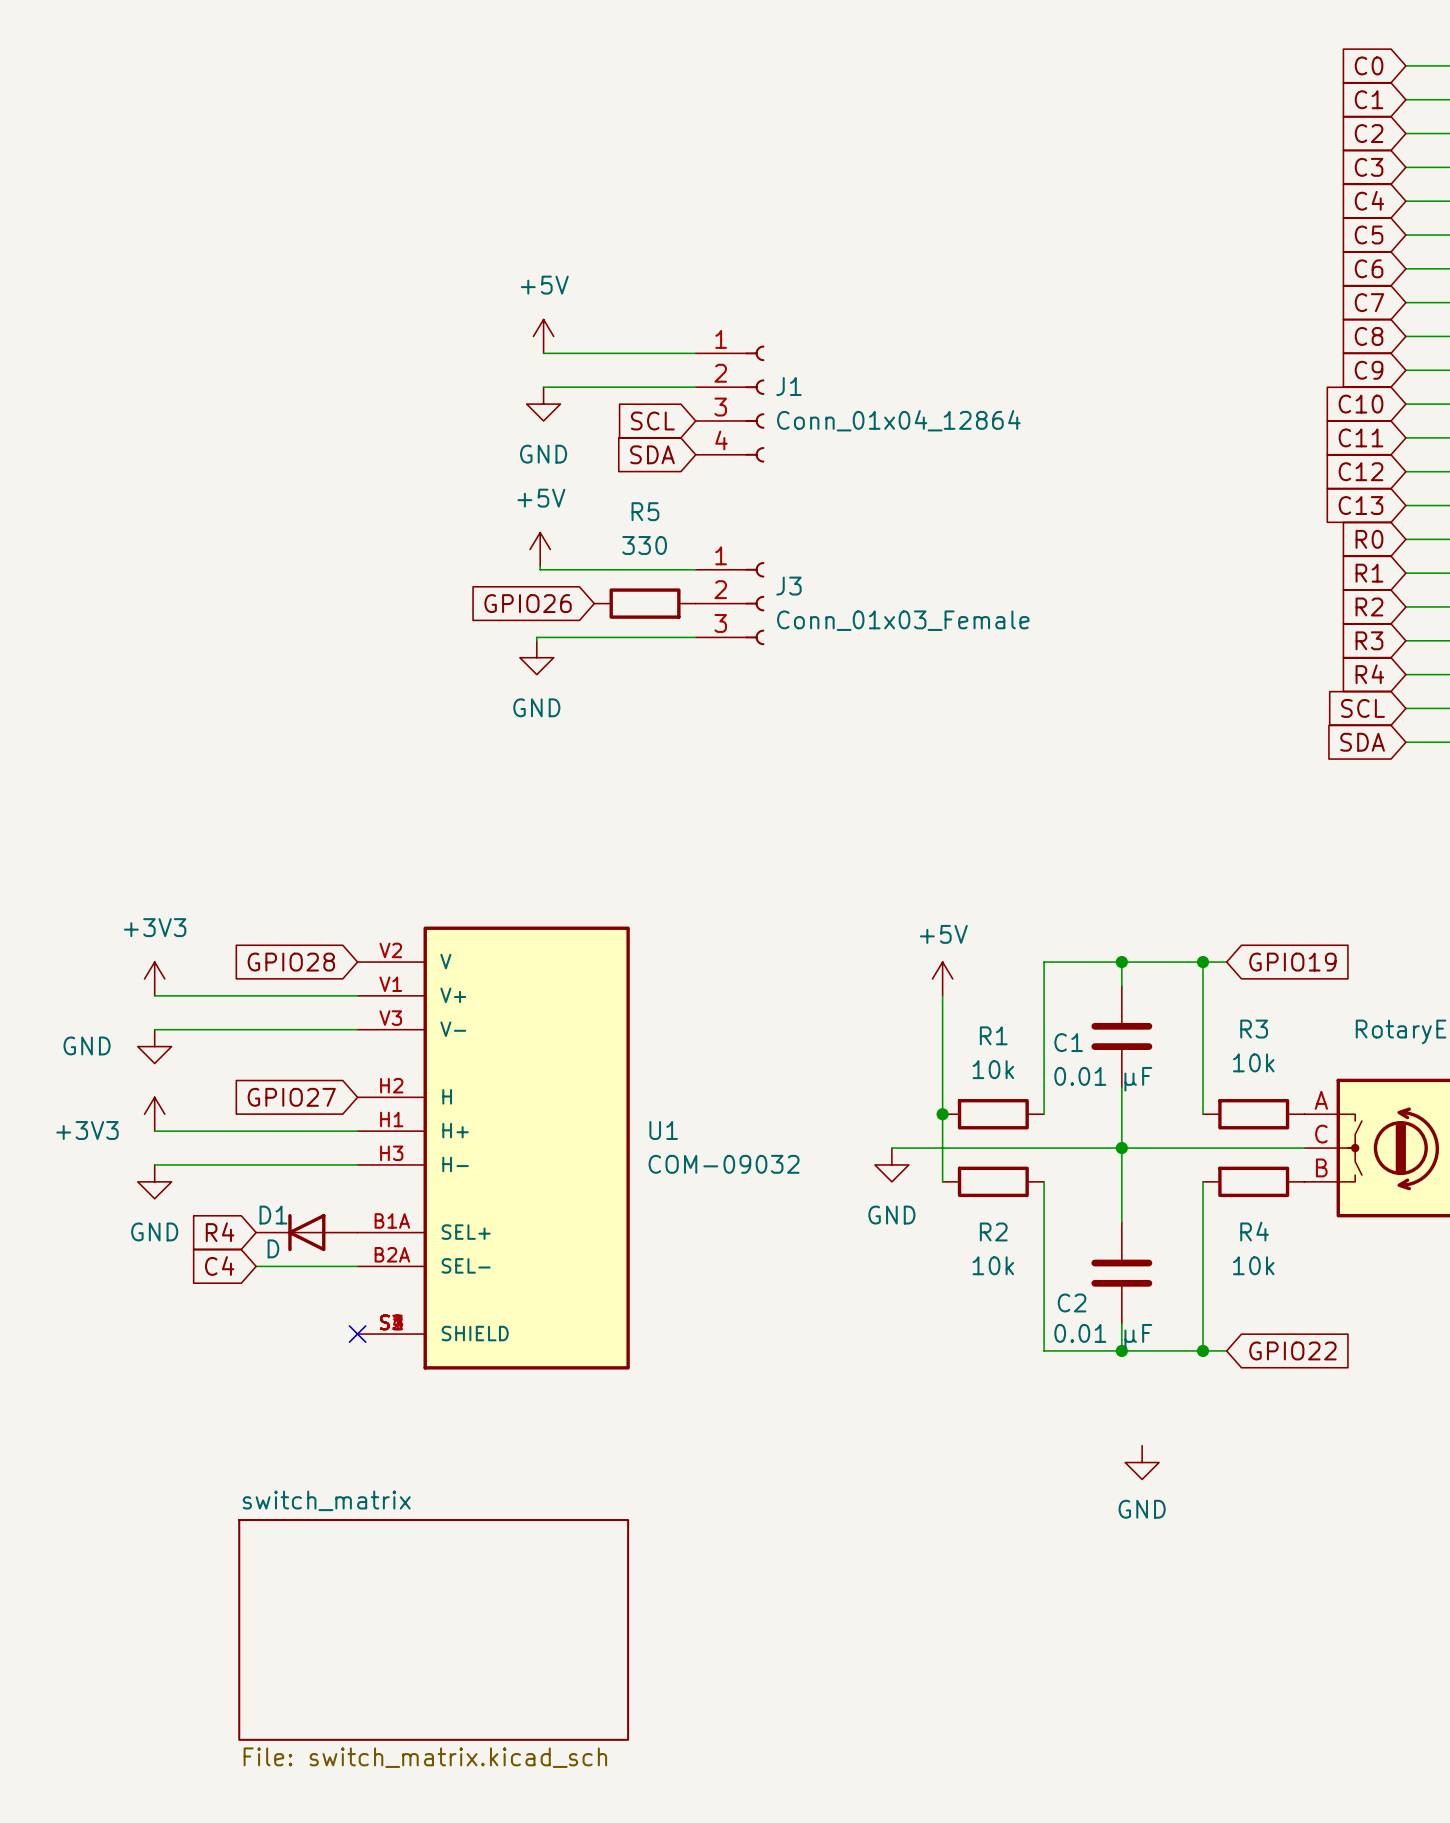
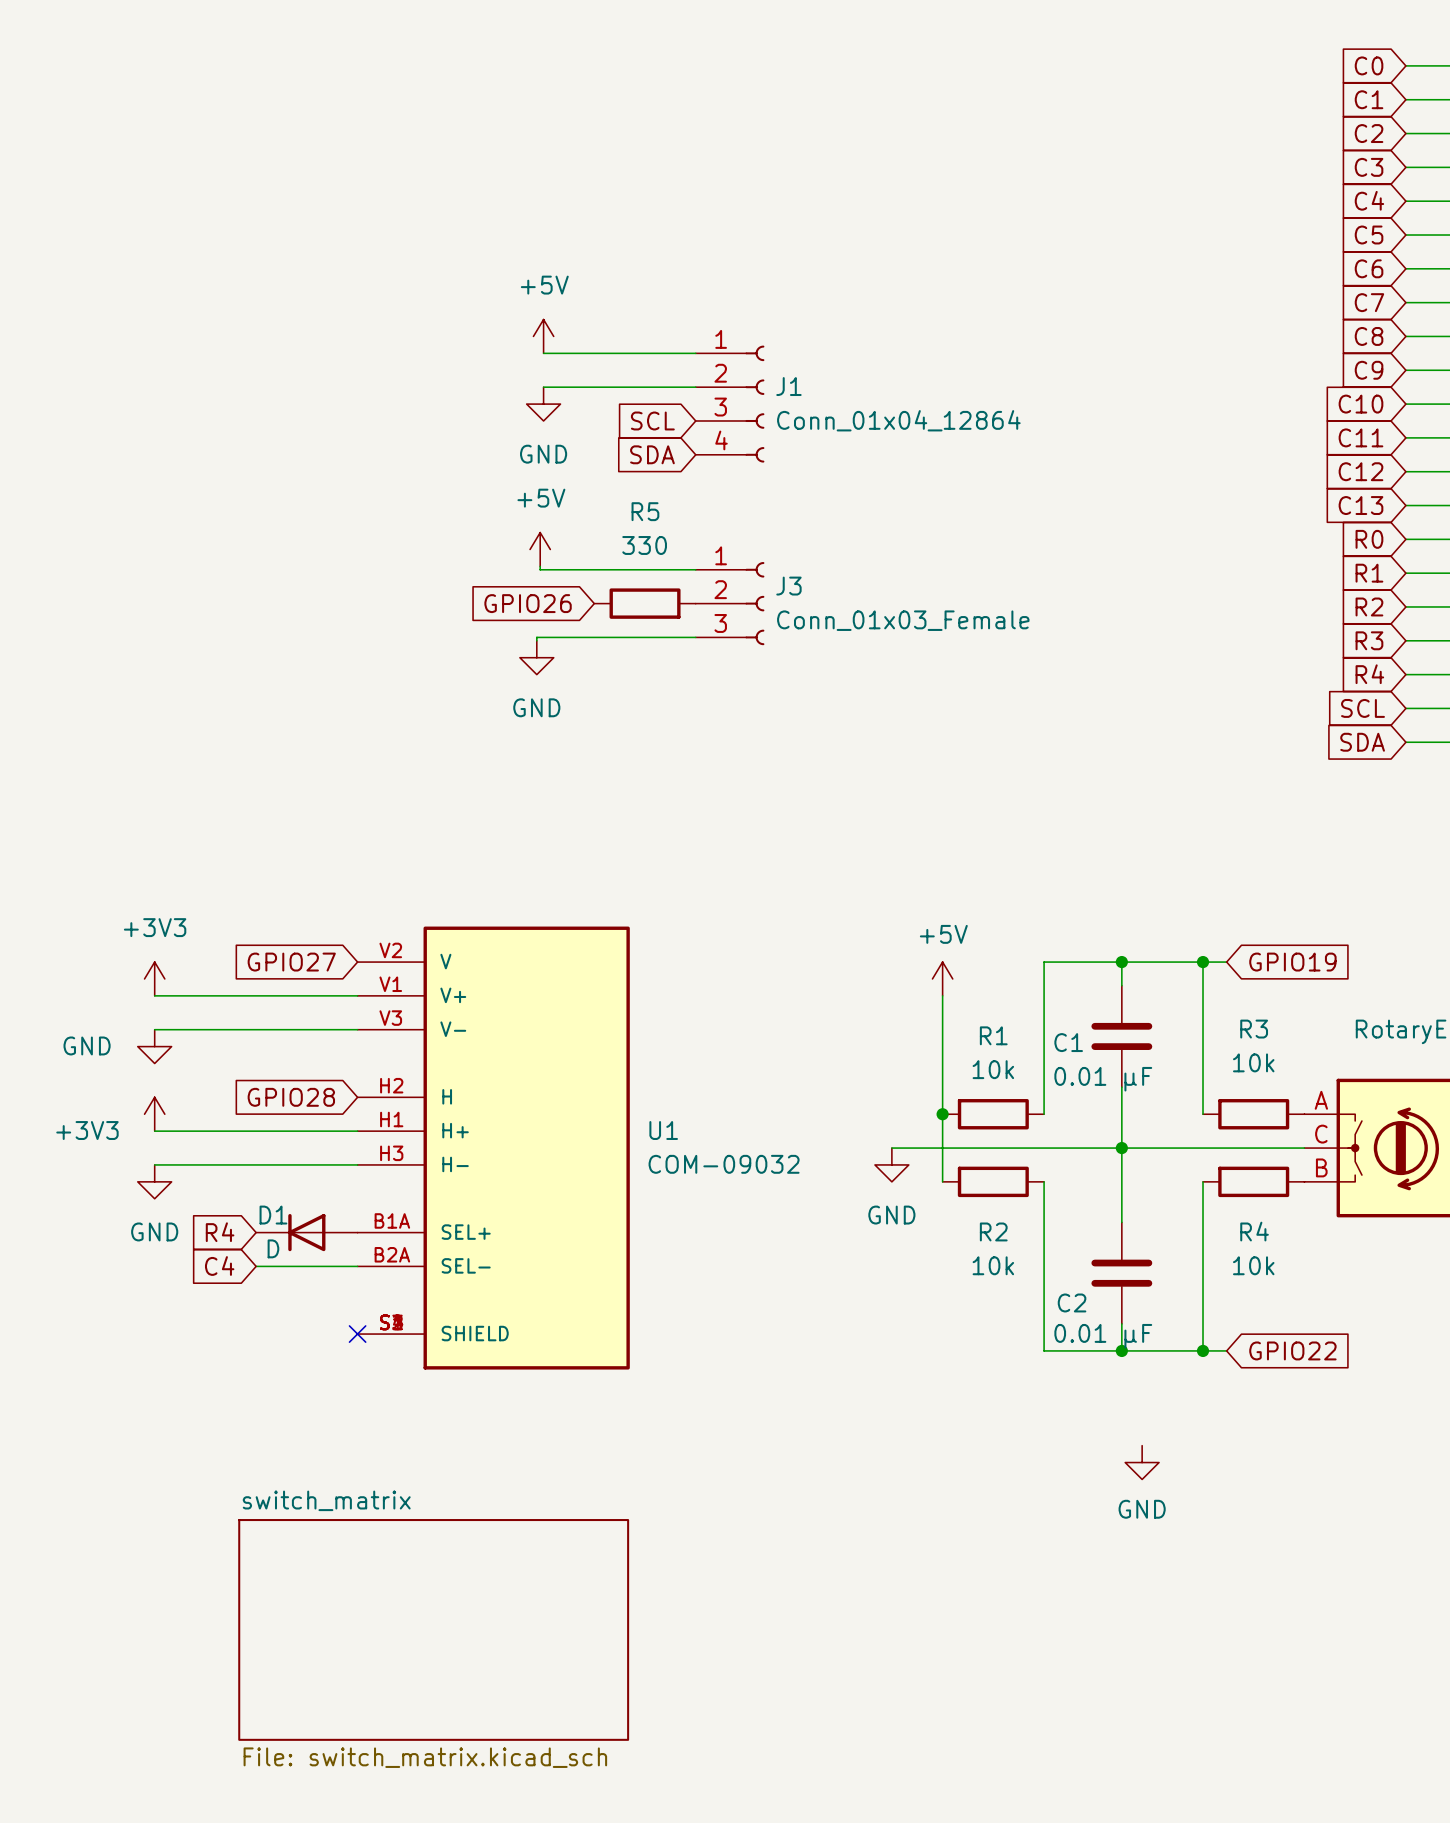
global label: GPIO28 (291, 962) -> GPIO27 (291, 962)
global label: GPIO27 (291, 1097) -> GPIO28 (291, 1097)

